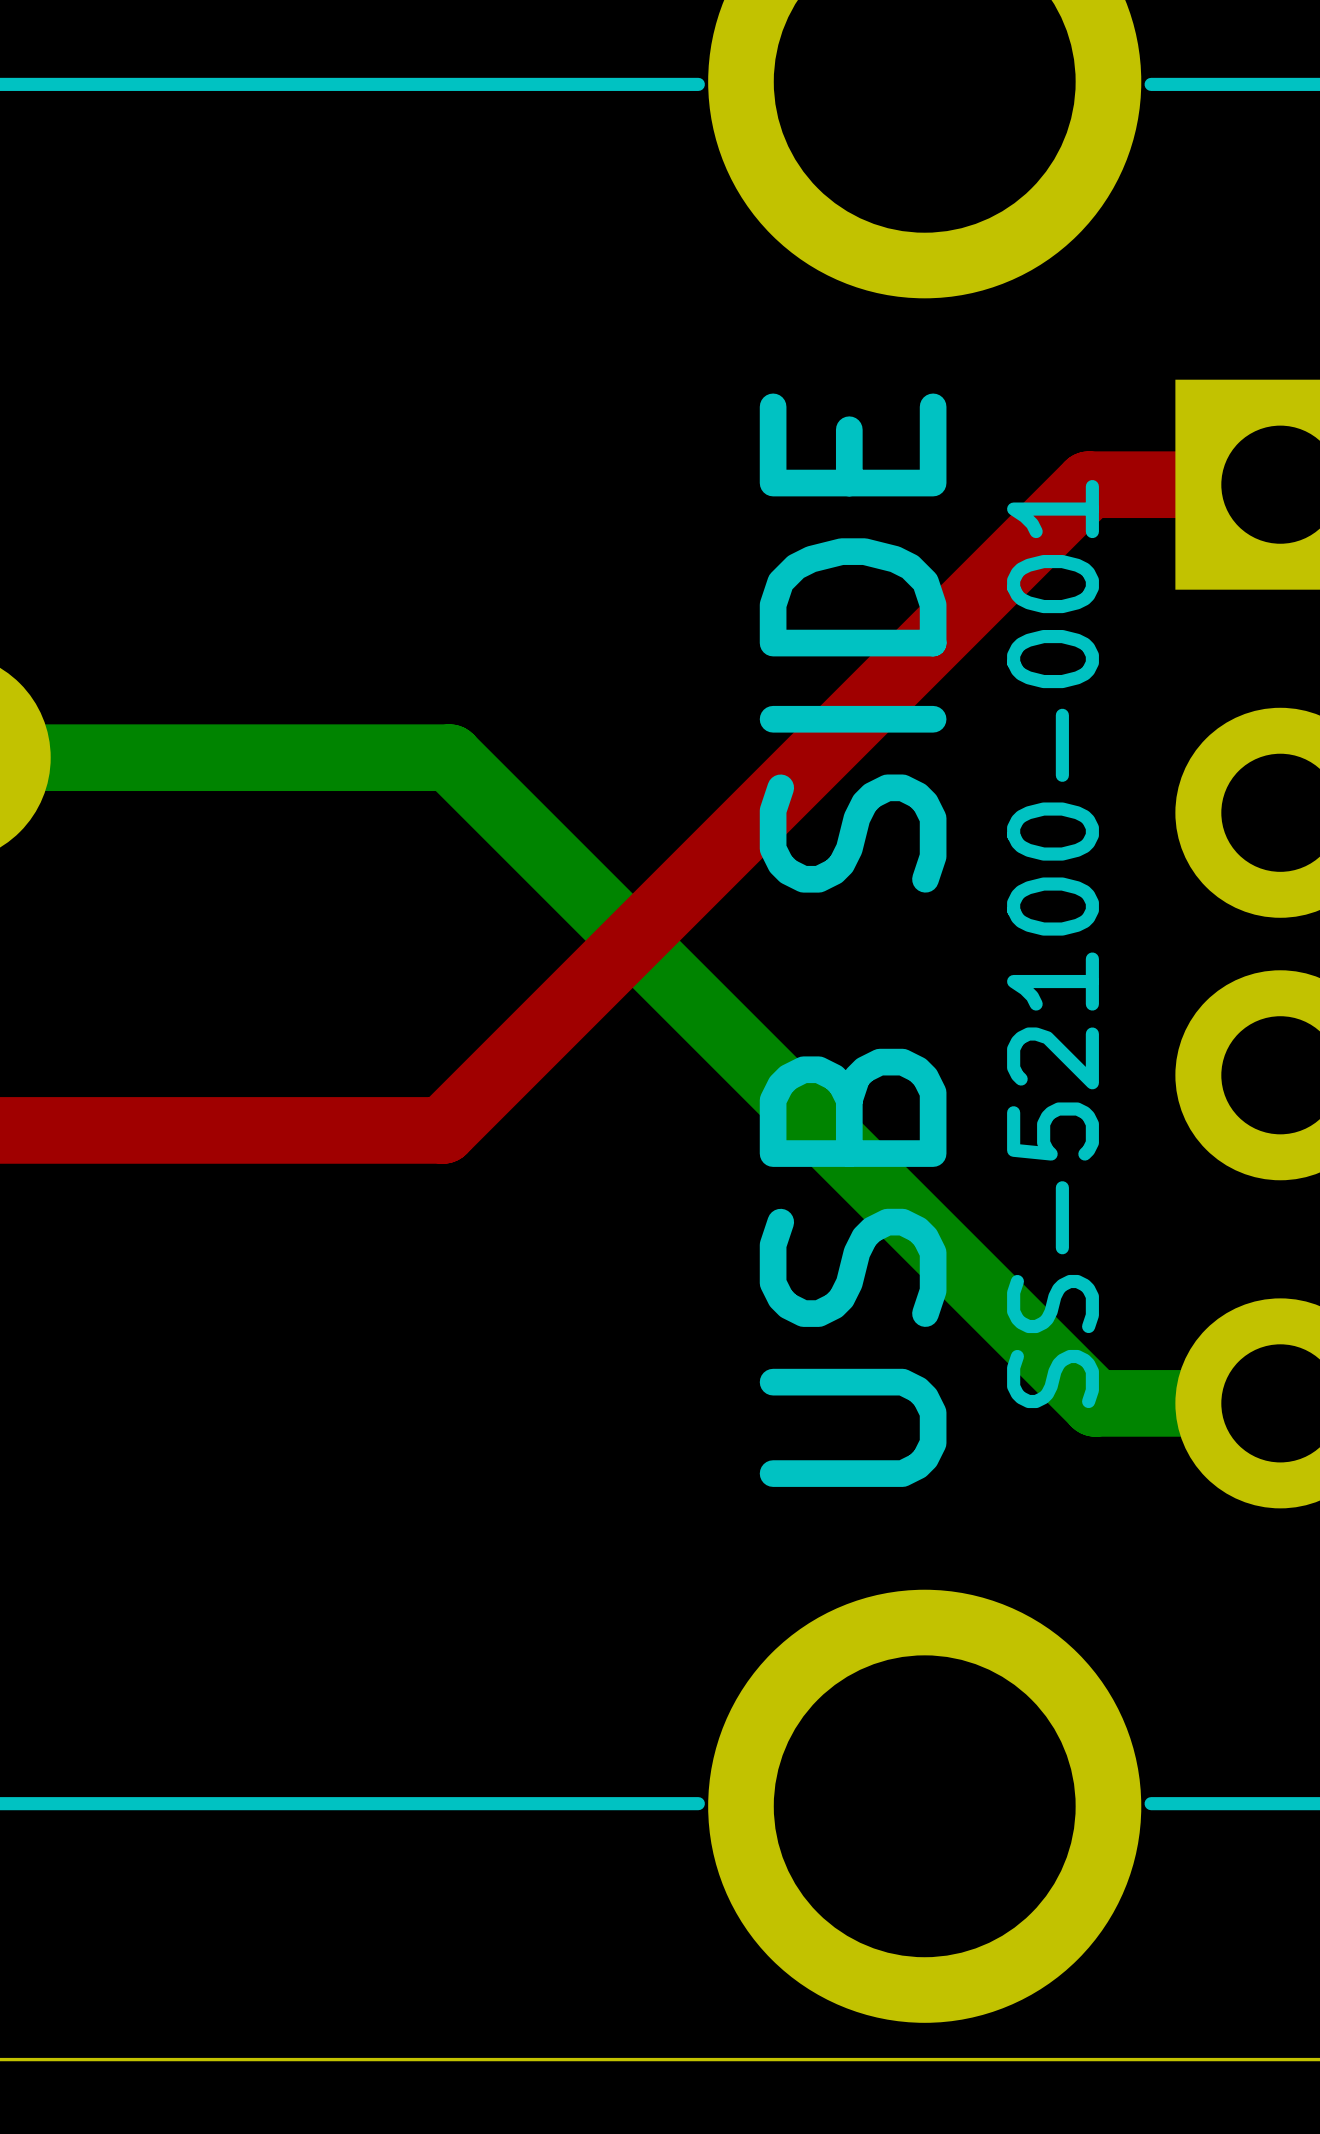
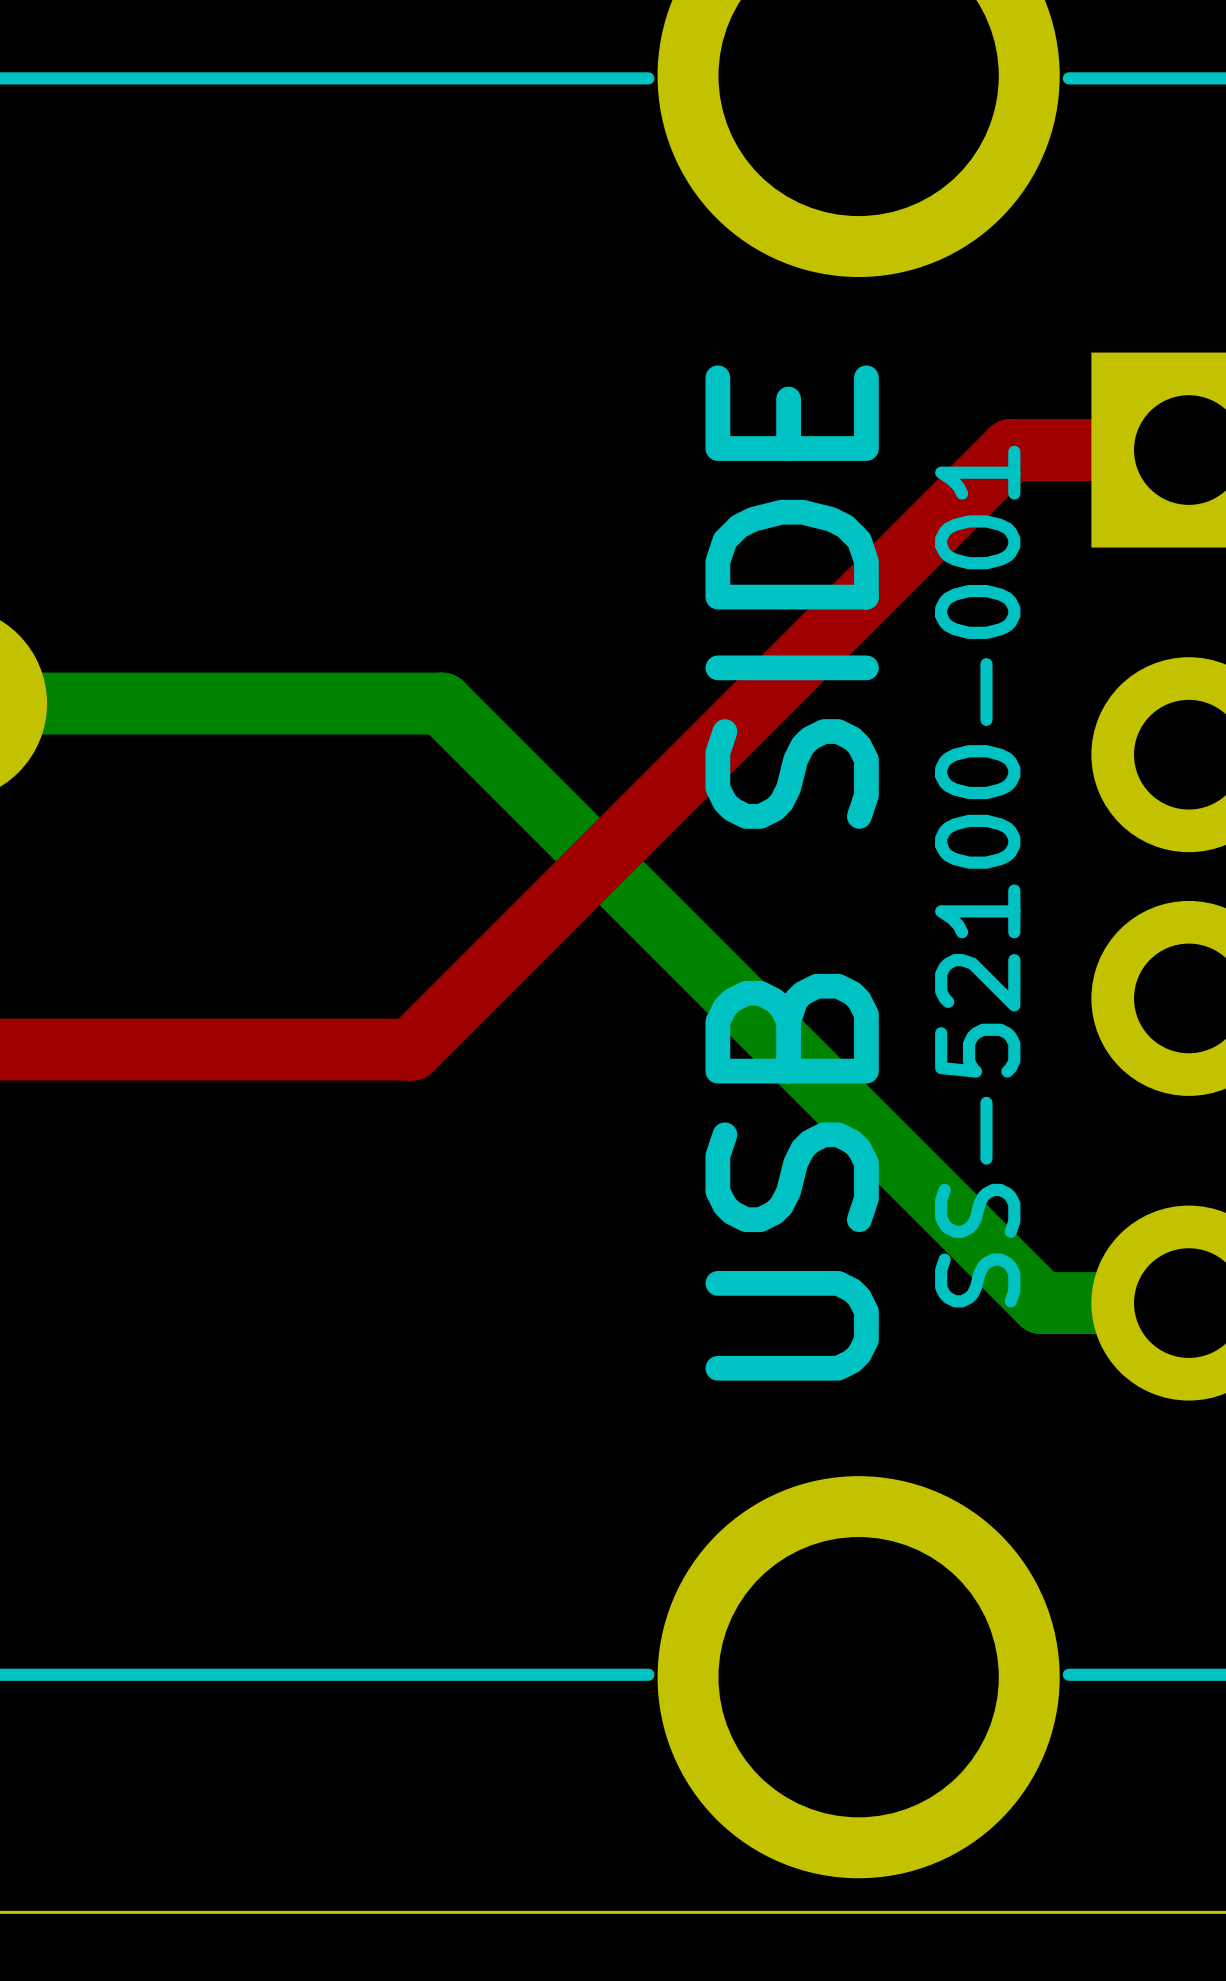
bottom track: (449, 757) (1095, 1403) (1121, 1403) -> (417, 703) (441, 703) (1041, 1303)

